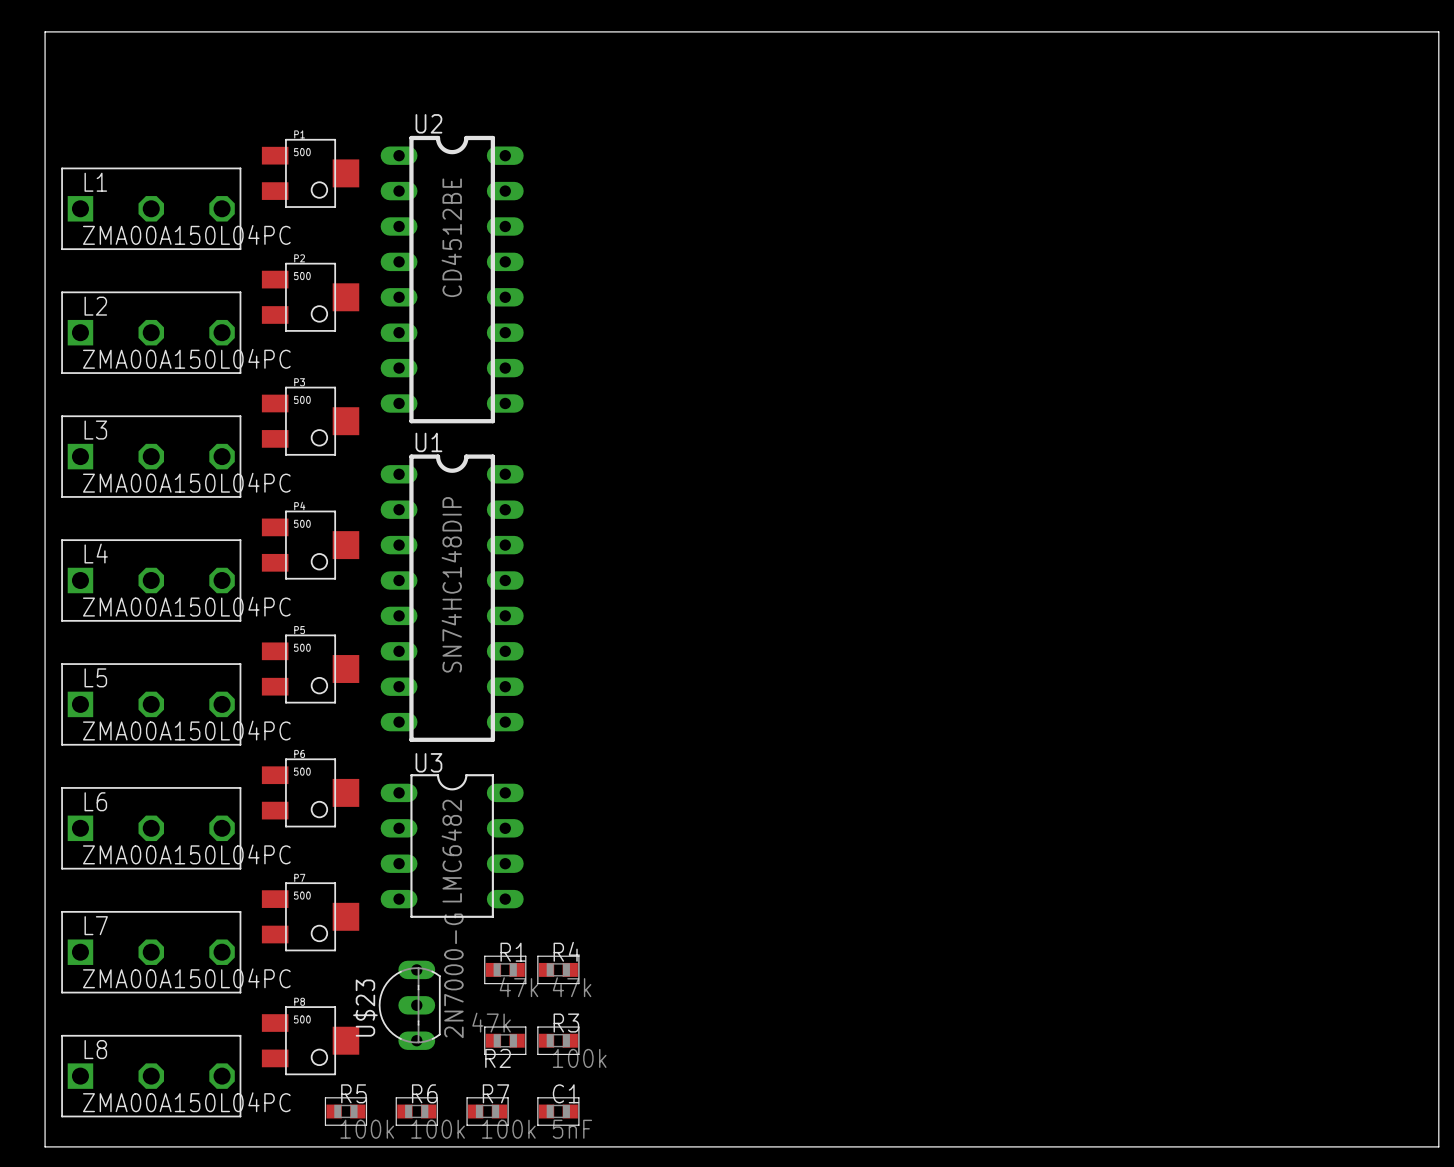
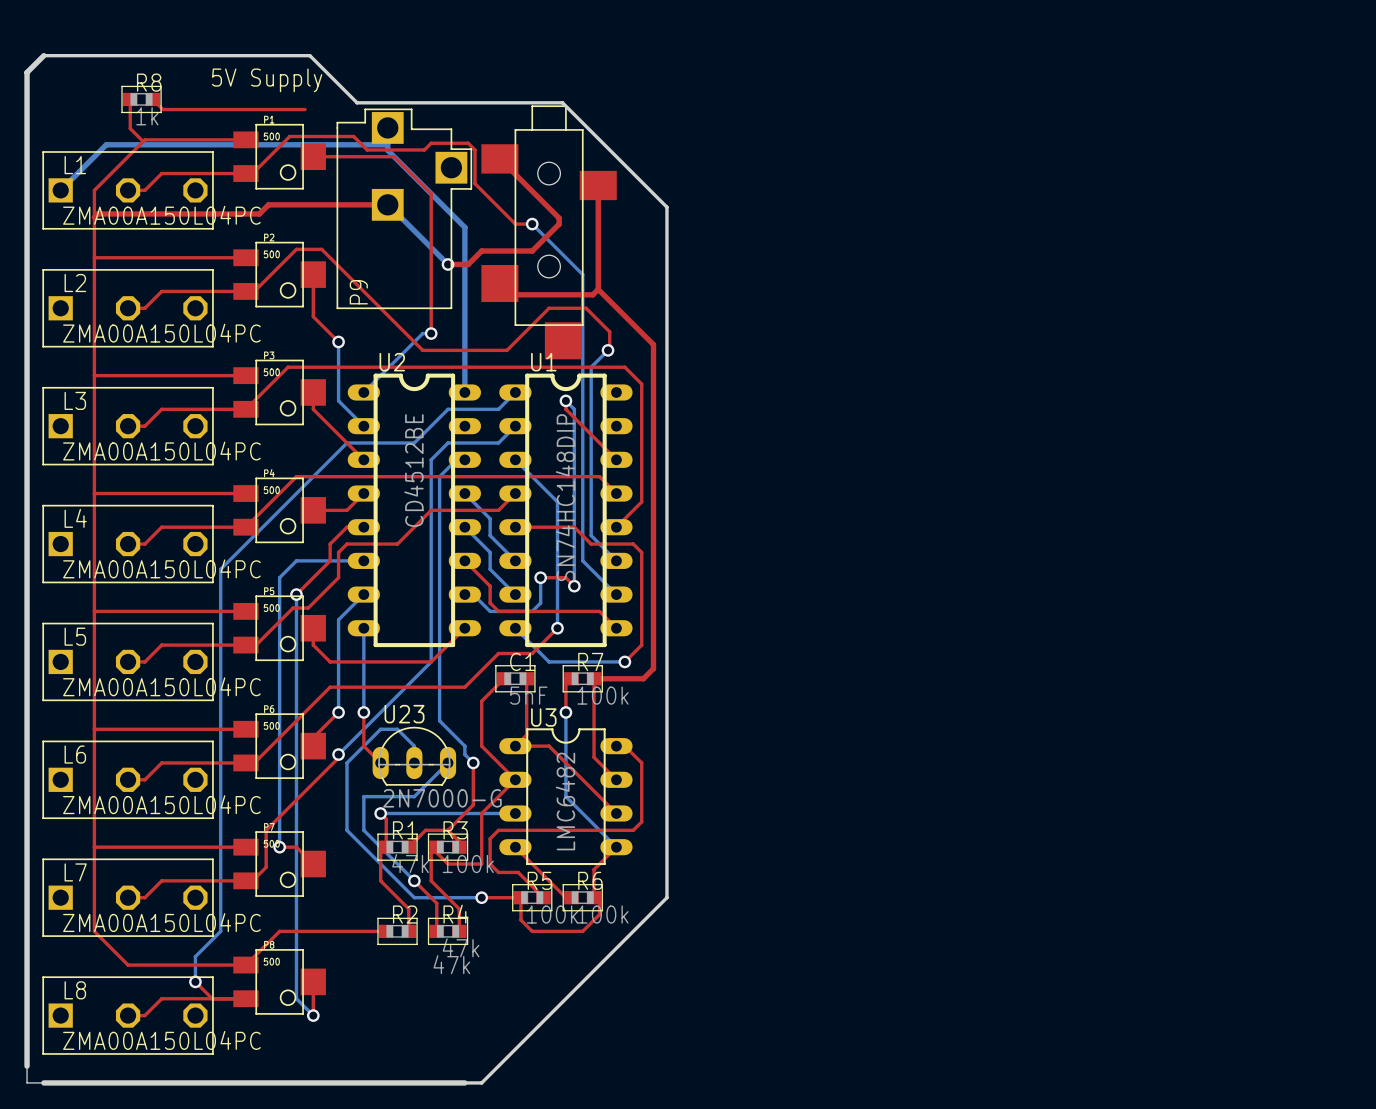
board edge: (45, 84) (45, 31) (1438, 31) (1438, 1146) (522, 1146) -> (27, 72) (43, 55) (309, 55) (357, 102) (562, 102) (666, 207) (666, 897) (481, 1082)
board edge width: thin (45, 84) (45, 1129) -> thick (27, 72) (27, 1066)
text: none -> 5V Supply (267, 80)
top track: none -> (130, 99) (130, 128) (143, 141)
R8: none -> 1k (141, 99)
top track: none -> (152, 99) (162, 109) (305, 109)
U2 footprint: [380, 135, 524, 424] -> [347, 373, 482, 648]
bottom track: none -> (387, 127) (387, 150) (464, 227) (464, 392)
top track: none -> (245, 139) (144, 139) (94, 190) (94, 931) (128, 965) (245, 965) (279, 931) (386, 931)
bottom track: none -> (387, 143) (386, 144) (106, 144) (60, 190)
top track: none -> (313, 156) (394, 156) (431, 193) (431, 333)
top track: none -> (499, 158) (559, 218) (559, 224) (532, 251) (481, 251) (468, 264) (448, 264)
top track: none -> (598, 185) (598, 289)
top track: none -> (128, 190) (144, 190) (161, 173) (252, 173) (289, 136) (353, 136) (367, 149) (424, 149) (431, 143) (468, 143) (474, 149) (474, 183) (515, 224) (532, 224)
top track: none -> (387, 204) (268, 204) (259, 213) (97, 213) (94, 217)
bottom track: none -> (387, 204) (448, 264)
P9: none -> (404, 208)
bottom track: none -> (532, 224) (582, 274) (582, 560) (616, 594)
via: none -> (532, 224)
part: none -> (549, 232)
top track: none -> (94, 257) (245, 257)
via: none -> (448, 264)
top track: none -> (313, 274) (313, 316) (338, 341)
top track: none -> (499, 283) (511, 294) (592, 294) (598, 289)
top track: none -> (598, 289) (653, 344) (653, 668) (643, 678) (594, 678) (594, 757) (616, 779)
top track: none -> (128, 308) (144, 308) (161, 291) (254, 291) (296, 249) (321, 249) (422, 350) (506, 350) (549, 308) (586, 308) (609, 331) (609, 348) (608, 350)
bottom track: none -> (431, 333) (422, 333) (363, 392)
via: none -> (431, 333)
bottom track: none -> (338, 341) (338, 400) (363, 426)
via: none -> (338, 341)
bottom track: none -> (608, 350) (591, 367) (591, 535) (616, 560)
via: none -> (608, 350)
top track: none -> (94, 375) (245, 375)
top track: none -> (313, 392) (313, 409) (363, 459)
bottom track: none -> (515, 392) (498, 409) (448, 409) (414, 443) (347, 443) (220, 569) (220, 931) (195, 956) (195, 981)
top track: none -> (565, 400) (565, 409) (616, 459)
bottom track: none -> (565, 400) (574, 409) (574, 586)
via: none -> (565, 400)
U1 footprint: [380, 454, 524, 742] -> [499, 373, 633, 648]
top track: none -> (128, 426) (144, 426) (161, 409) (245, 409) (288, 367) (624, 367) (641, 384) (641, 501) (616, 527)
bottom track: none -> (515, 426) (498, 443) (448, 443) (431, 459) (431, 661) (338, 754)
bottom track: none -> (464, 459) (456, 459) (439, 476) (439, 720) (464, 746) (464, 754) (473, 762)
bottom track: none -> (515, 459) (557, 501) (557, 628)
top track: none -> (94, 493) (245, 493)
top track: none -> (363, 493) (347, 510) (313, 510)
bottom track: none -> (464, 493) (490, 518) (490, 535) (515, 560)
top track: none -> (515, 493) (498, 510) (431, 510) (397, 544) (347, 544) (338, 552) (338, 577) (308, 608) (293, 608) (256, 645) (161, 645) (144, 661) (128, 661)
top track: none -> (616, 493) (599, 476) (296, 476) (245, 527) (161, 527) (144, 544) (128, 544)
top track: none -> (363, 527) (347, 527) (330, 544) (330, 560) (296, 594)
bottom track: none -> (464, 527) (490, 552) (490, 569) (515, 594)
top track: none -> (515, 527) (574, 527) (591, 544) (633, 544) (641, 552) (641, 645) (624, 661)
bottom track: none -> (363, 560) (296, 560) (279, 577) (279, 847)
top track: none -> (464, 560) (490, 586) (490, 602) (498, 611) (599, 611) (616, 628)
top track: none -> (540, 577) (565, 577) (574, 586)
bottom track: none -> (540, 577) (540, 602) (532, 611) (490, 611) (473, 594) (464, 594)
via: none -> (540, 577)
via: none -> (574, 586)
bottom track: none -> (296, 594) (296, 998) (313, 1015)
via: none -> (296, 594)
bottom track: none -> (363, 594) (338, 619) (338, 712)
top track: none -> (94, 611) (245, 611)
top track: none -> (313, 628) (313, 645) (330, 661) (431, 661) (464, 628)
bottom track: none -> (363, 628) (363, 712)
bottom track: none -> (515, 628) (549, 661) (624, 661)
top track: none -> (557, 628) (532, 653) (498, 653) (464, 687) (330, 687) (254, 762) (161, 762) (144, 779) (128, 779)
via: none -> (557, 628)
via: none -> (624, 661)
top track: none -> (504, 678) (481, 701) (481, 746) (515, 779) (481, 813) (481, 864) (448, 864) (436, 852) (436, 847) (431, 852) (431, 880) (459, 908) (459, 931)
top track: none -> (526, 678) (526, 734) (515, 746) (549, 746) (616, 813)
top track: none -> (571, 678) (565, 678) (565, 712)
top track: none -> (338, 712) (313, 737) (313, 746)
via: none -> (338, 712)
top track: none -> (363, 712) (363, 746) (380, 762)
via: none -> (363, 712)
bottom track: none -> (565, 712) (565, 796) (616, 847)
via: none -> (565, 712)
U3 footprint: [380, 774, 524, 918] -> [499, 728, 633, 866]
top track: none -> (94, 729) (245, 729)
top track: none -> (616, 746) (624, 746) (641, 762) (641, 821) (633, 830) (498, 830) (490, 838) (490, 864) (498, 872) (518, 872) (543, 897)
top track: none -> (338, 754) (338, 757) (266, 830) (266, 867) (252, 880)
via: none -> (338, 754)
U23: none -> 2N7000-G (414, 756)
bottom track: none -> (414, 762) (414, 746) (397, 729) (380, 729) (347, 762) (347, 830) (414, 897) (481, 897)
bottom track: none -> (448, 762) (414, 796) (363, 796) (363, 830) (414, 880)
top track: none -> (473, 762) (473, 805) (448, 830)
via: none -> (473, 762)
top track: none -> (380, 813) (386, 819) (386, 847) (380, 852) (380, 880) (408, 908) (408, 931)
bottom track: none -> (380, 813) (515, 813)
via: none -> (380, 813)
top track: none -> (448, 830) (425, 830) (408, 847)
top track: none -> (448, 830) (459, 841) (459, 847)
top track: none -> (94, 847) (245, 847)
top track: none -> (279, 847) (296, 847) (313, 864)
via: none -> (279, 847)
top track: none -> (515, 847) (565, 897) (571, 897)
top track: none -> (616, 847) (594, 869) (594, 897) (599, 903) (599, 914) (582, 931) (532, 931) (520, 920) (520, 897) (481, 897)
top track: none -> (254, 880) (161, 880) (144, 897) (128, 897)
top track: none -> (414, 880) (436, 903) (436, 931)
via: none -> (414, 880)
via: none -> (481, 897)
R1 position: (505, 969) -> (397, 847)
R4 position: (558, 969) -> (448, 931)
U$23: 2N7000-G (409, 1005) -> none
top track: none -> (195, 981) (212, 998)
via: none -> (195, 981)
top track: none -> (313, 981) (313, 1015)
R2 position: (505, 1040) -> (397, 931)
R3 position: (558, 1040) -> (448, 847)
top track: none -> (245, 998) (161, 998) (144, 1015) (128, 1015)
R2 name position: R2 (498, 1058) -> R2 (405, 914)
via: none -> (313, 1015)
R5 position: (345, 1111) -> (532, 897)
R6 position: (416, 1111) -> (582, 897)
R7 position: (487, 1111) -> (582, 678)
C1 position: (558, 1111) -> (515, 678)
board edge width: thin (62, 1146) (522, 1146) -> thick (43, 1082) (481, 1082)

